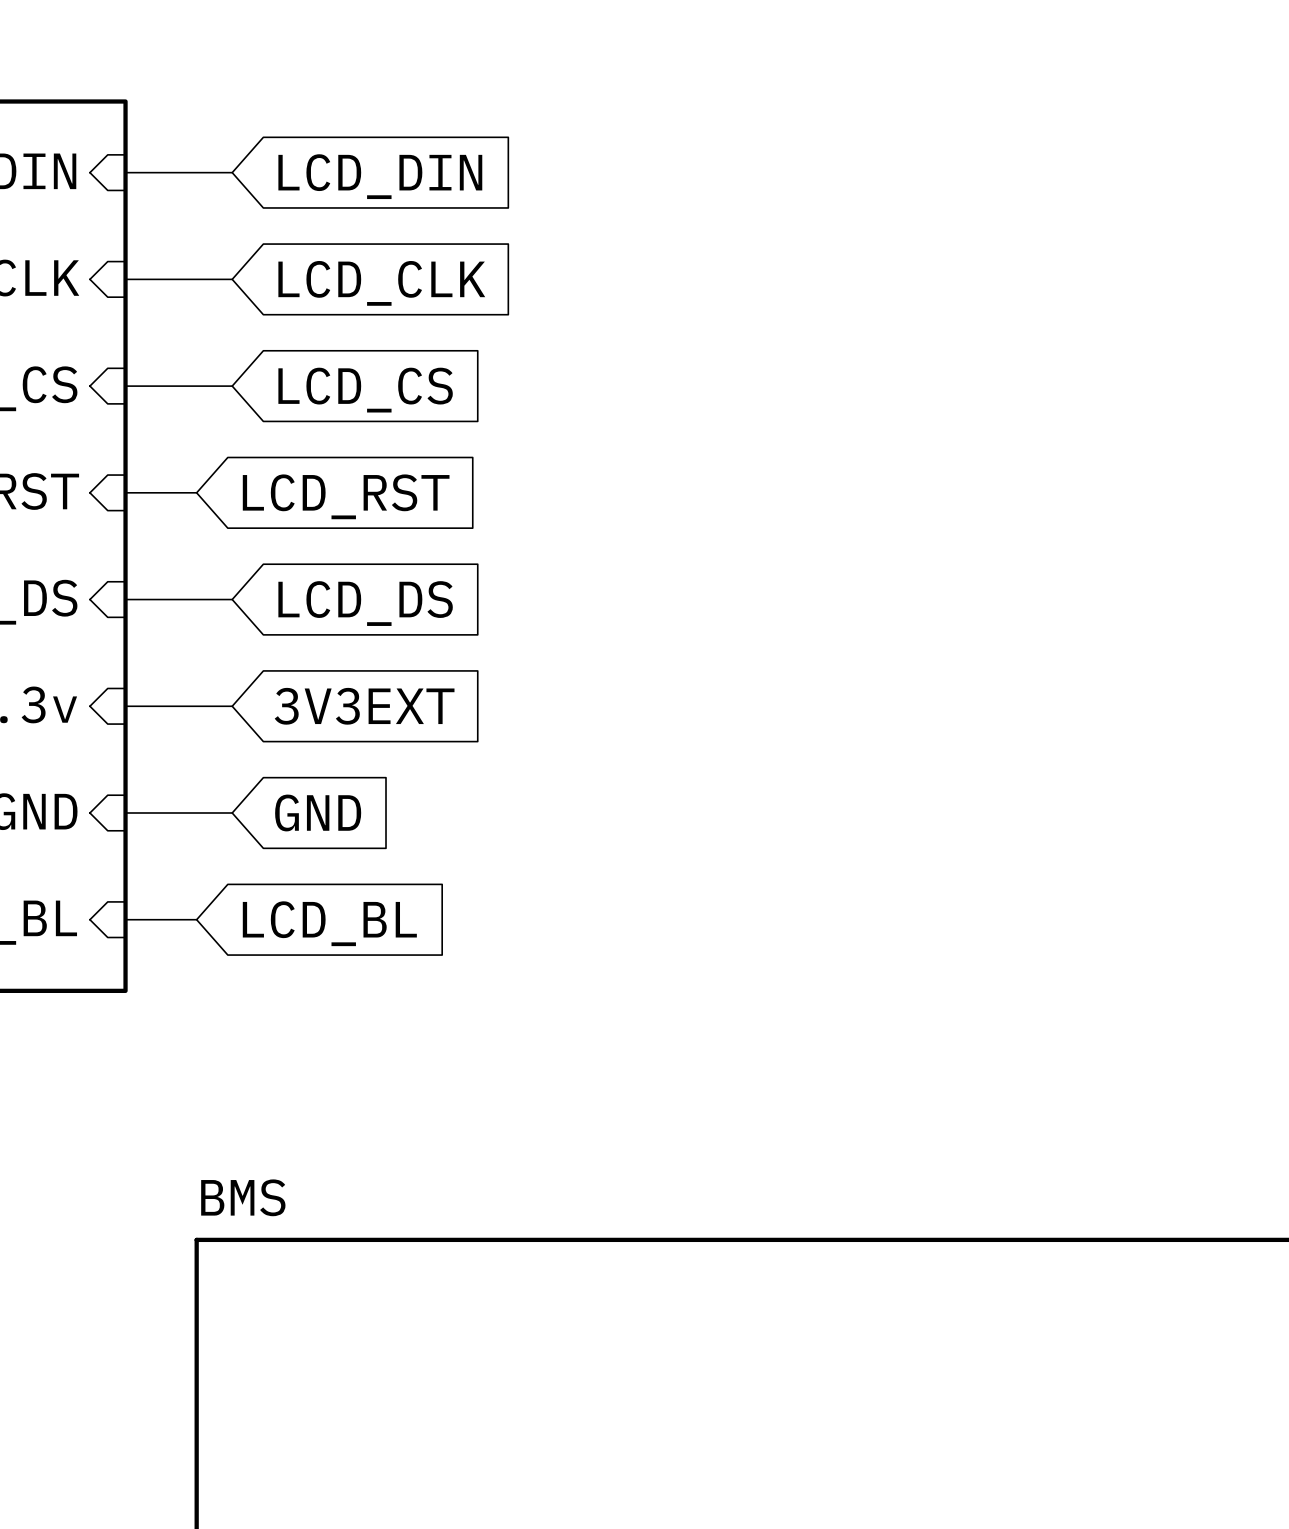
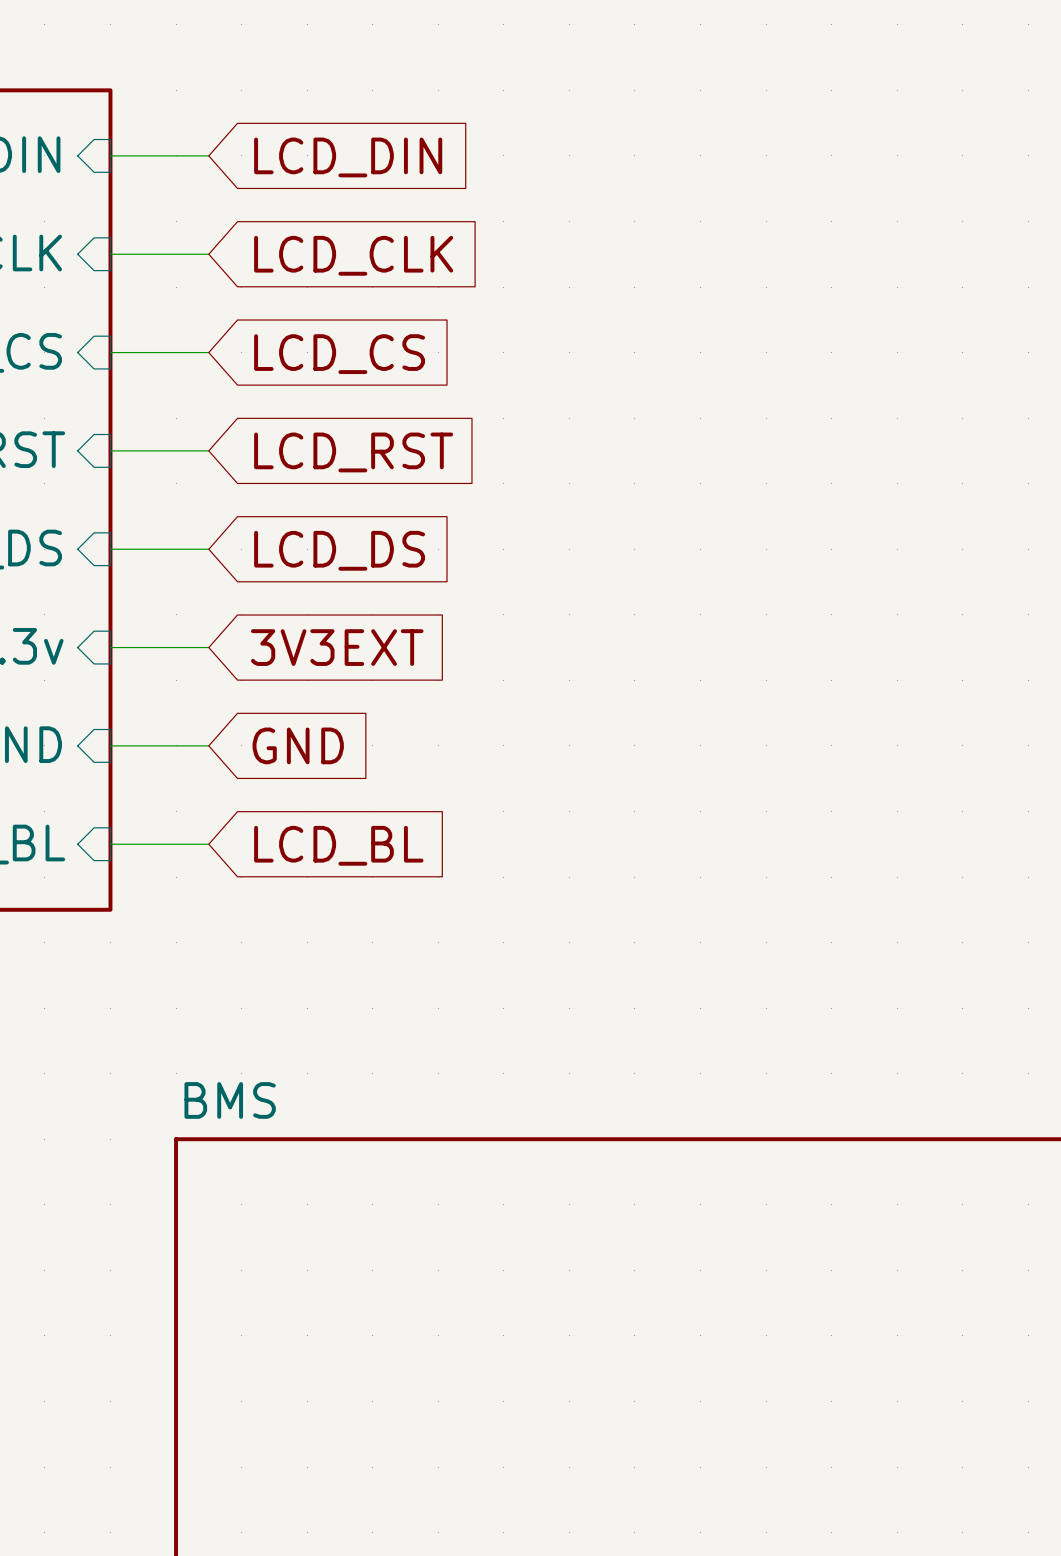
wire: none -> (176, 450) (208, 450)
global label position: LCD_RST (346, 496) -> LCD_RST (353, 452)
wire: none -> (176, 844) (208, 844)
global label position: LCD_BL (329, 923) -> LCD_BL (338, 845)

